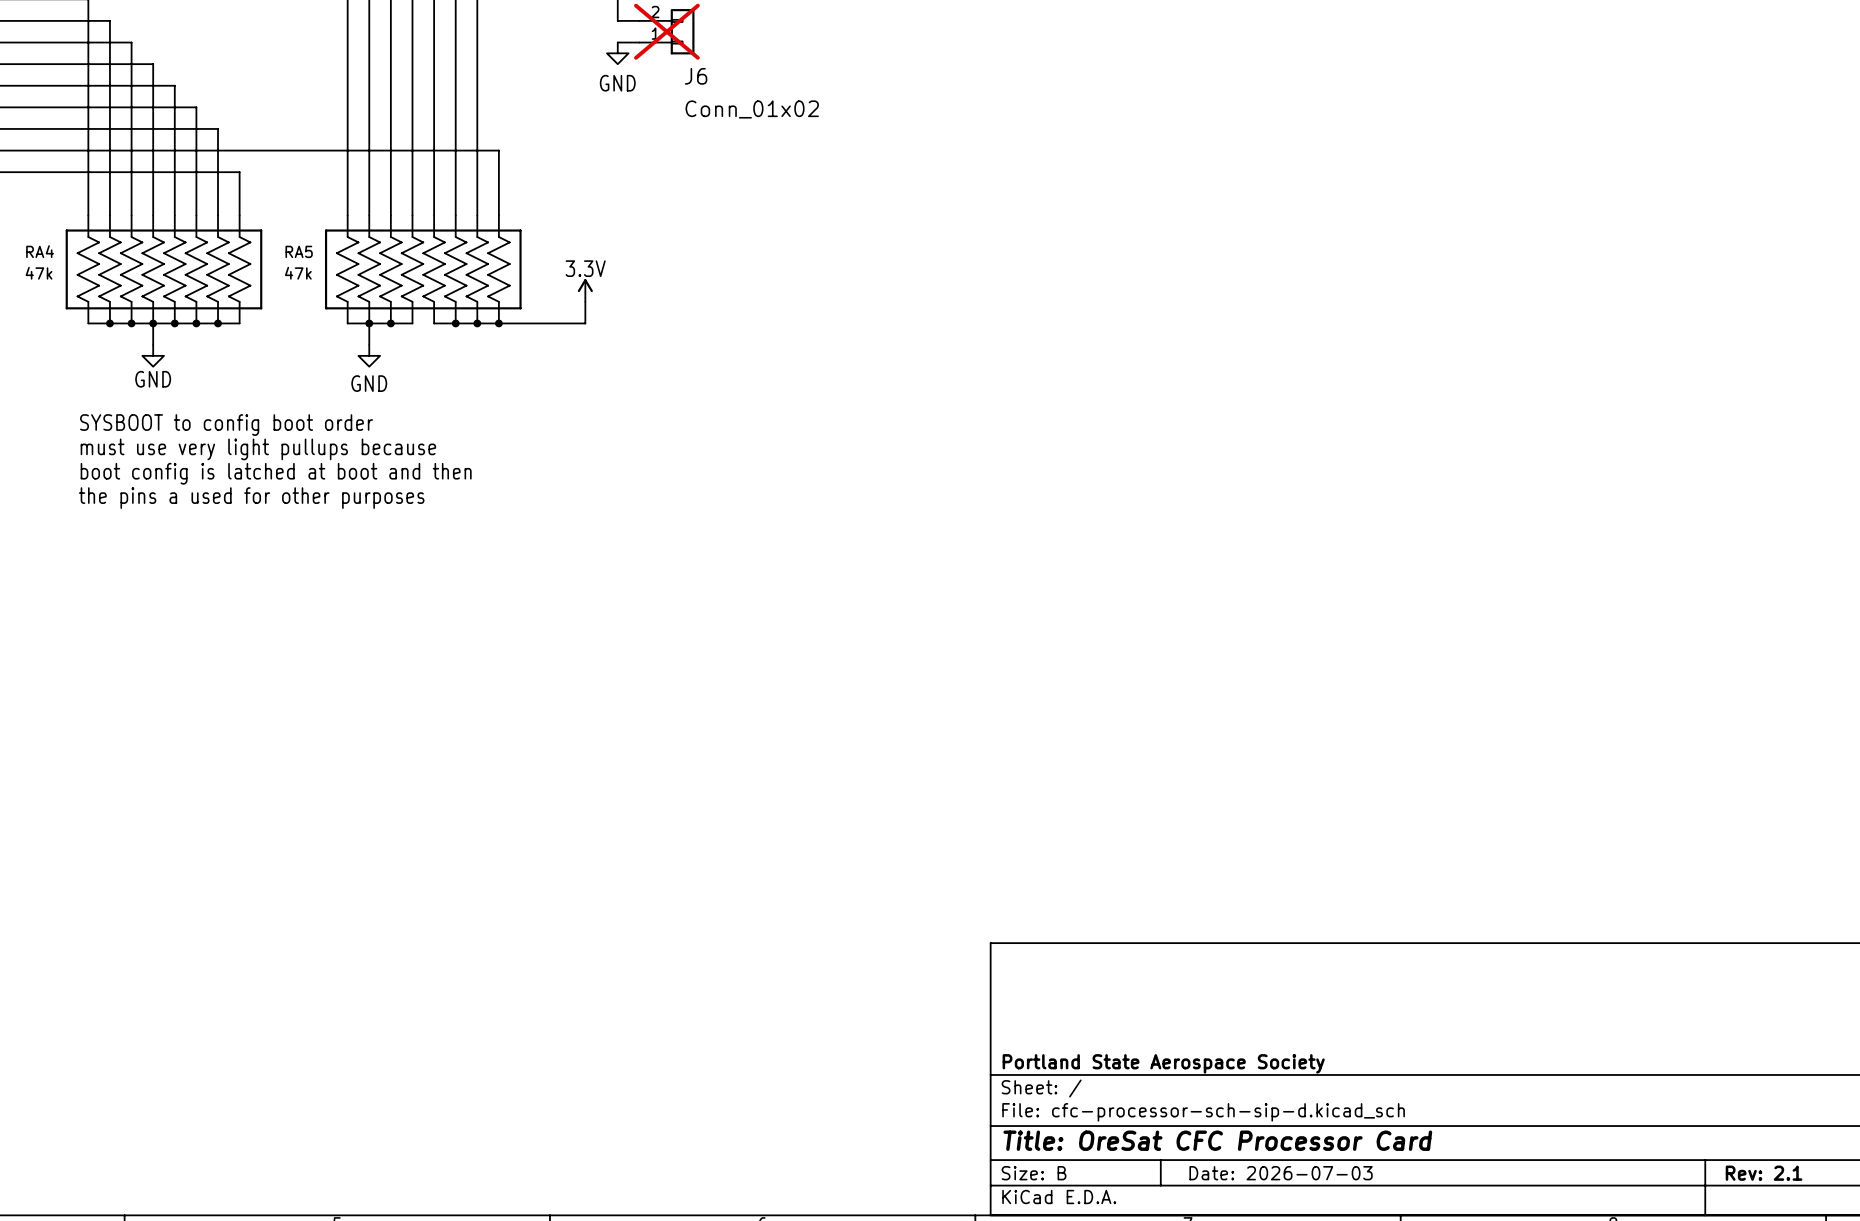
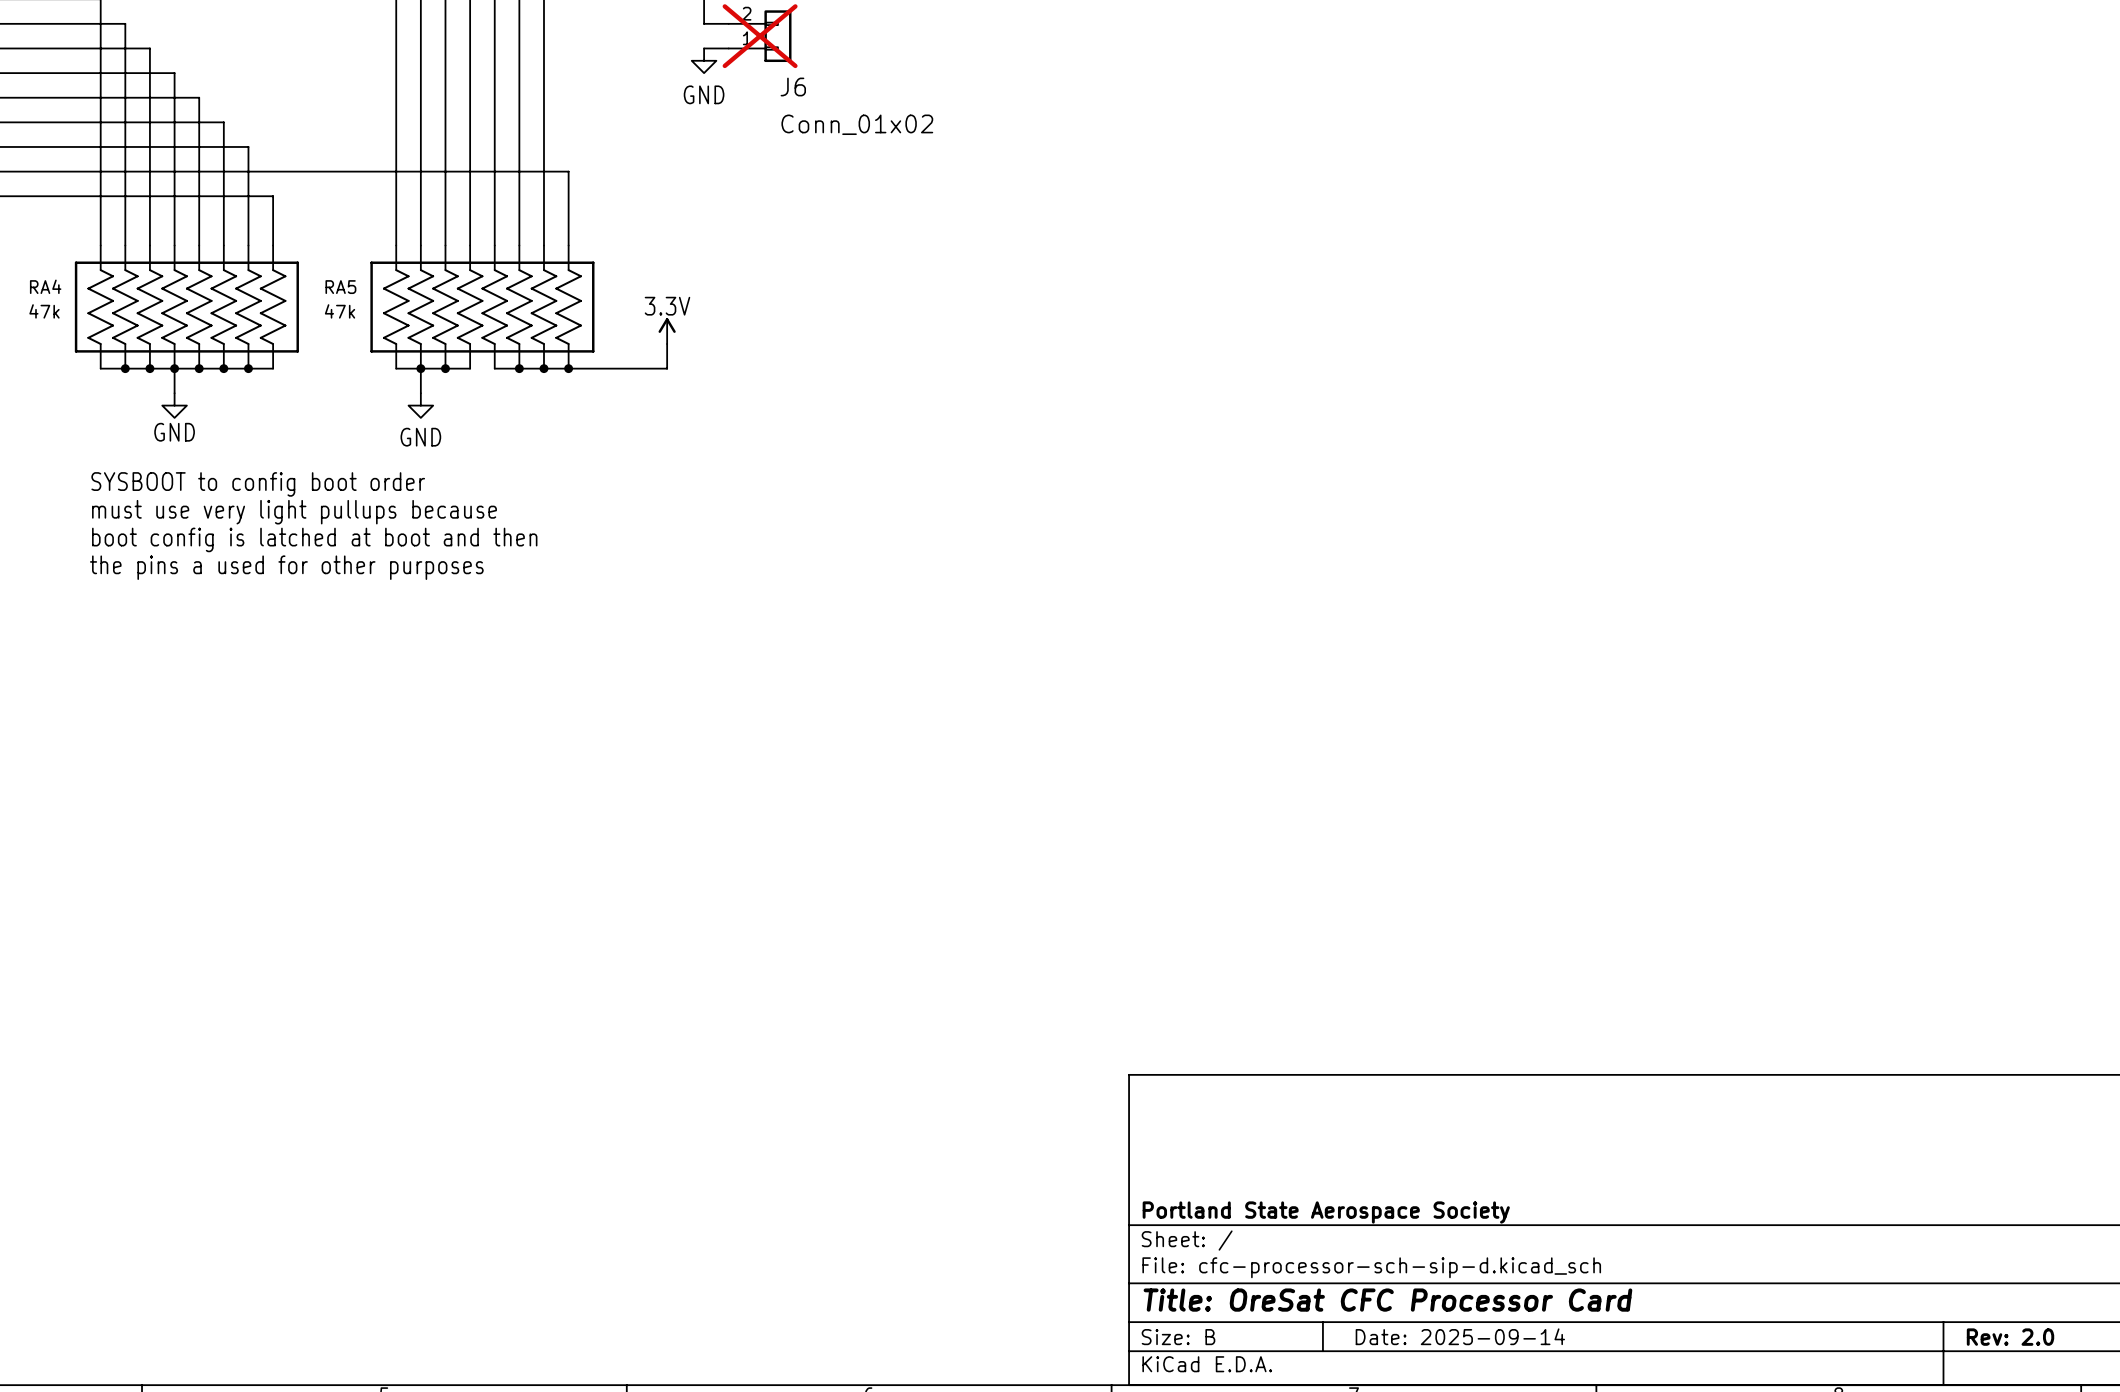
title block: Date: 2026-07-03 (1281, 1173) -> Date: 2025-09-14 (1460, 1336)
title block: Rev: 2.1 (1764, 1173) -> Rev: 2.0 (2010, 1337)

